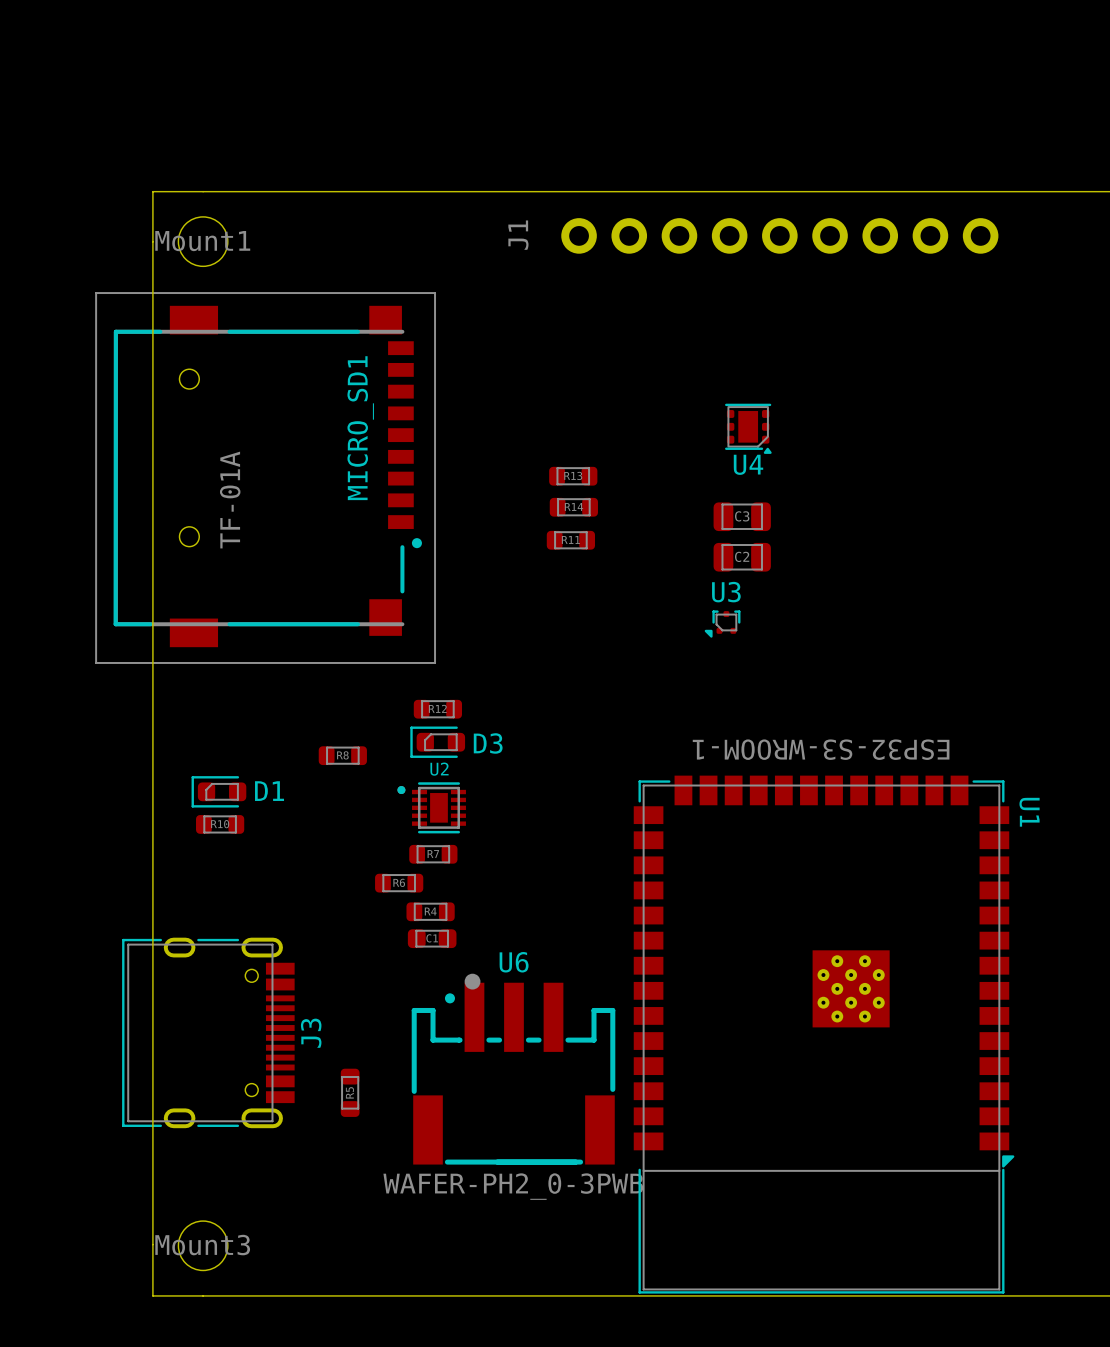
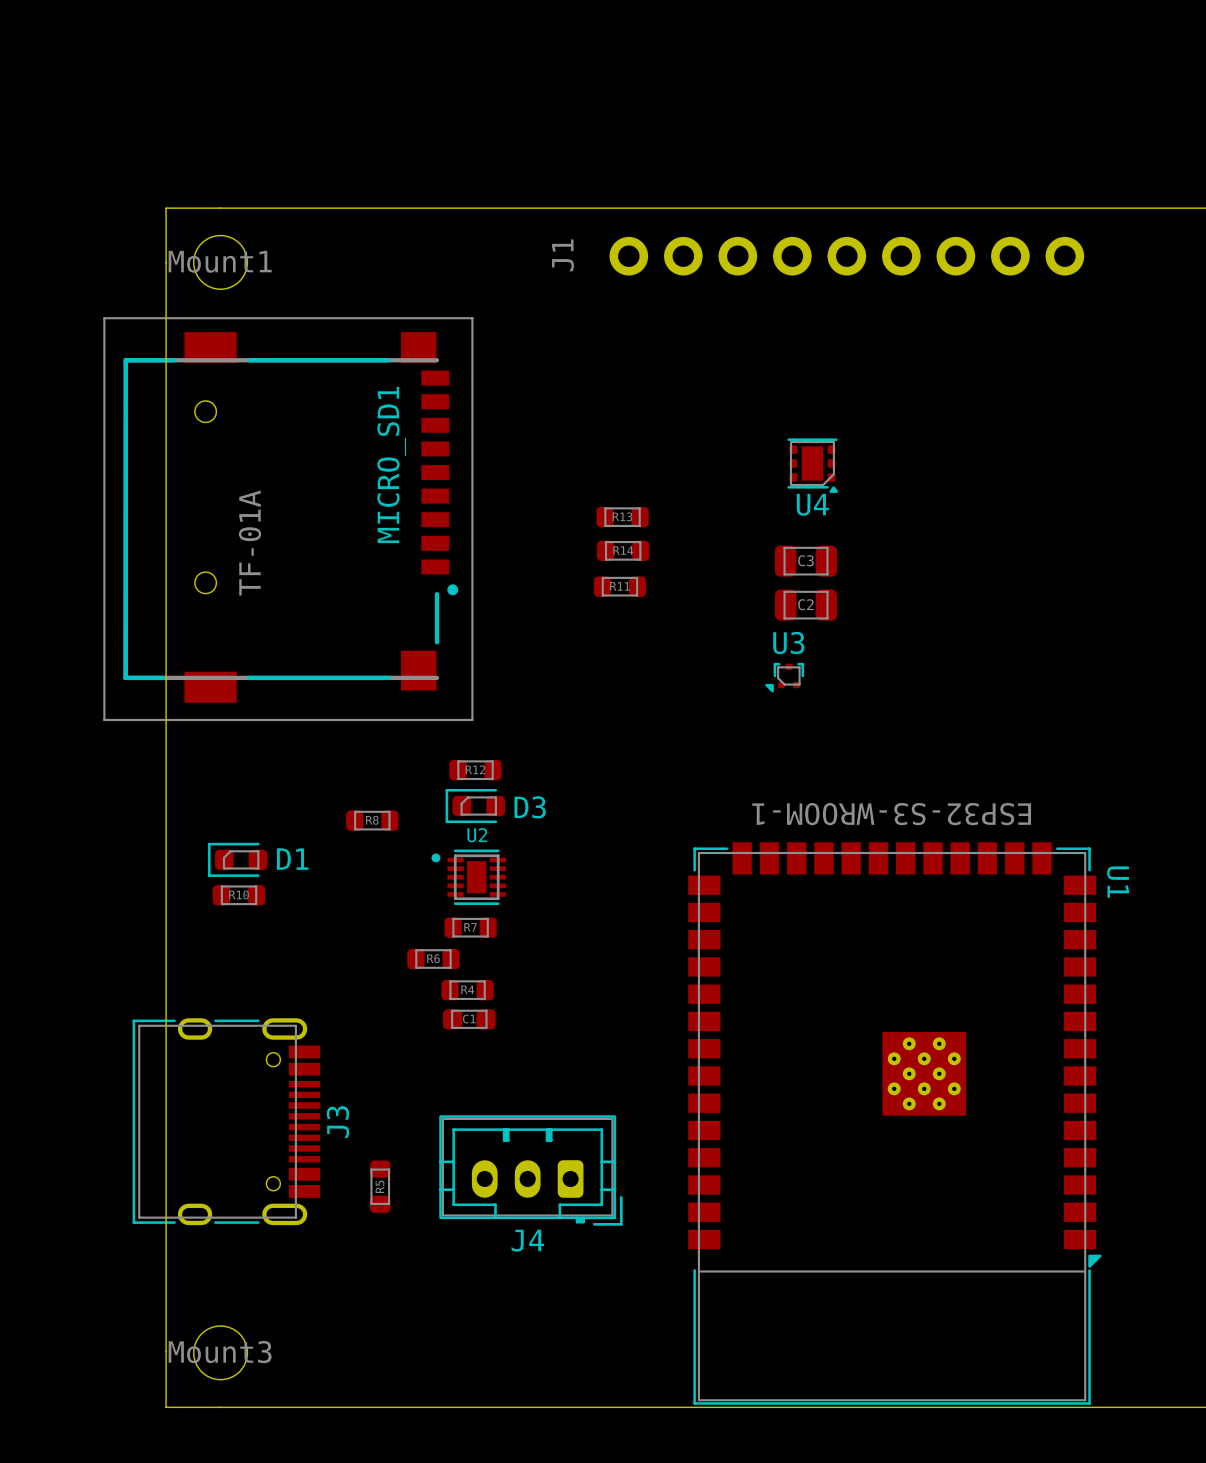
U6: WAFER-PH2_0-3PWB (513, 1069) -> none
J4: none -> (530, 1170)

